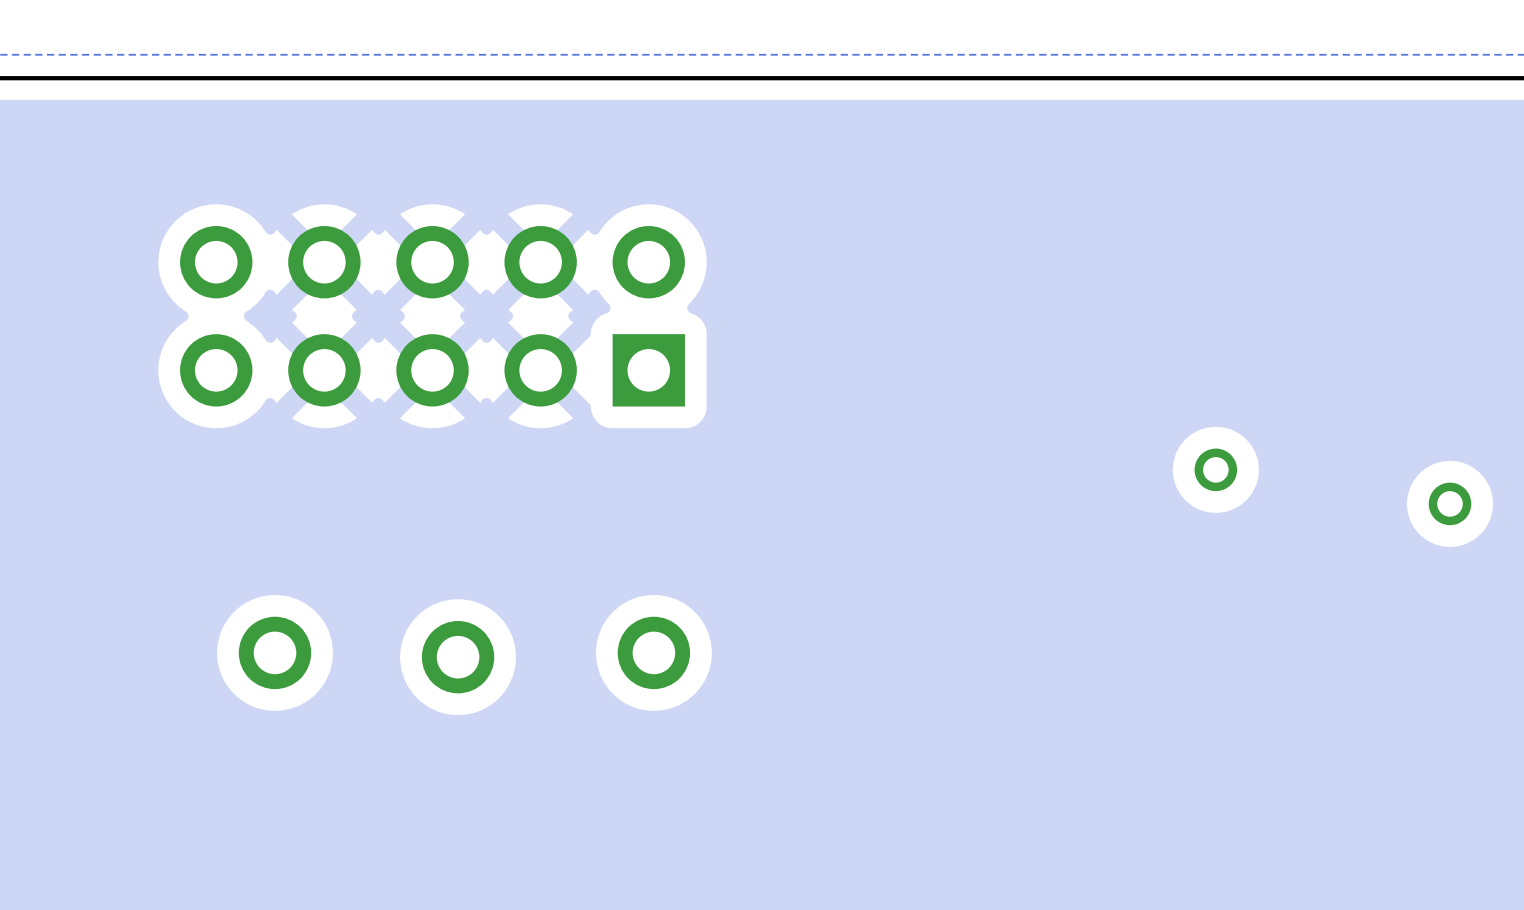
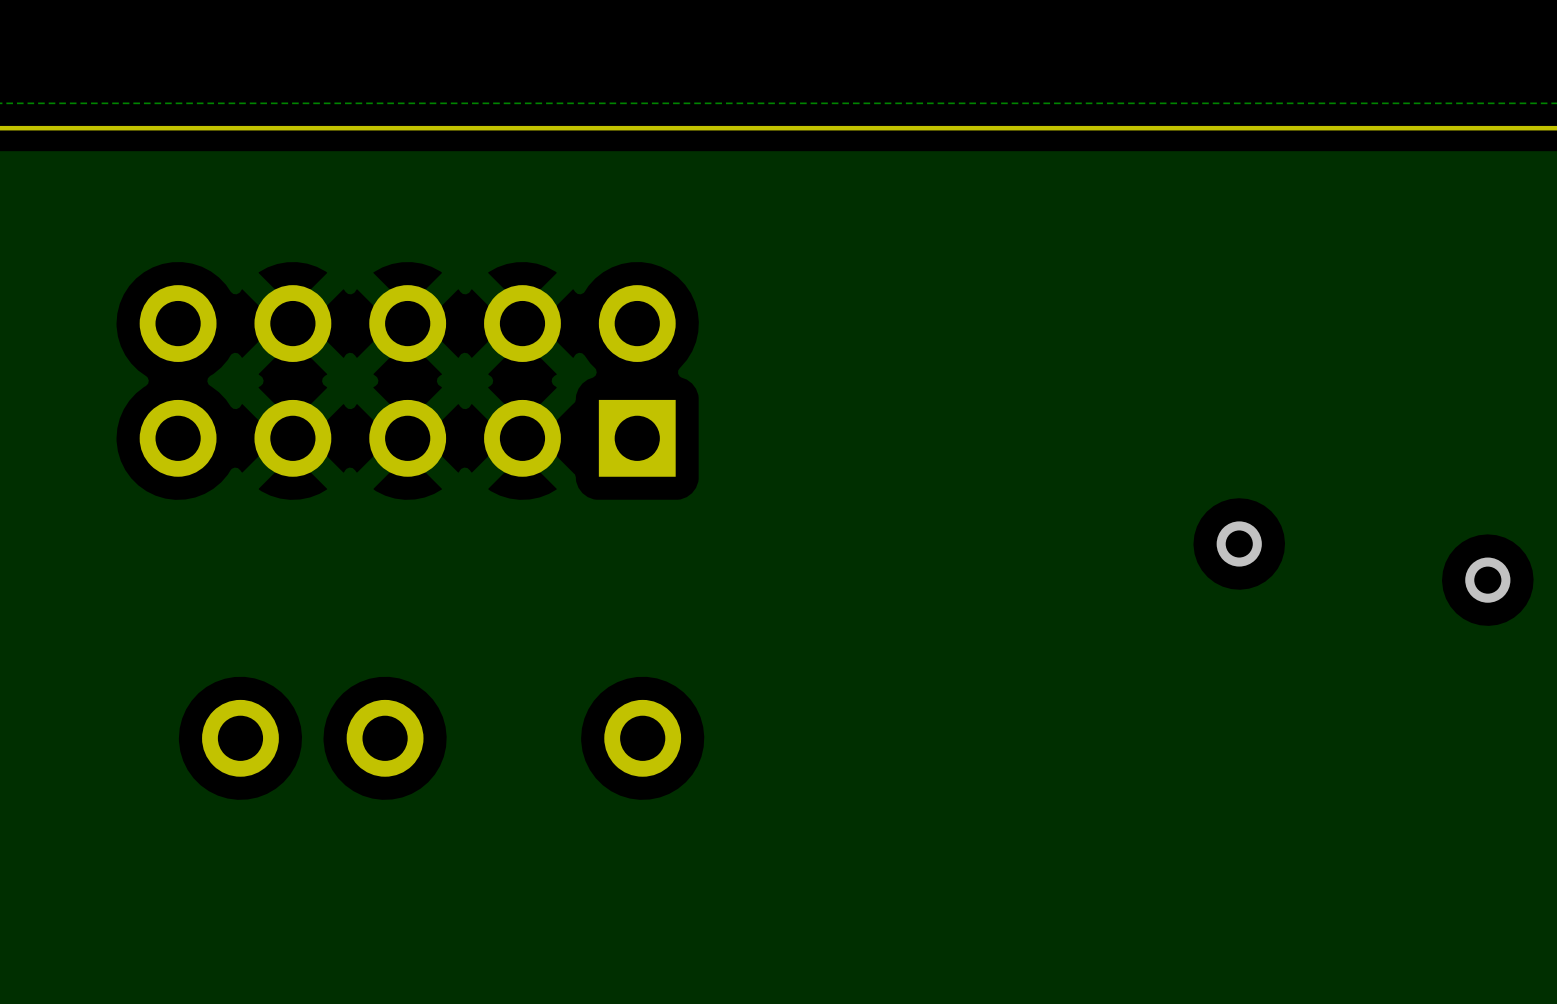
part position: (458, 657) -> (385, 738)

